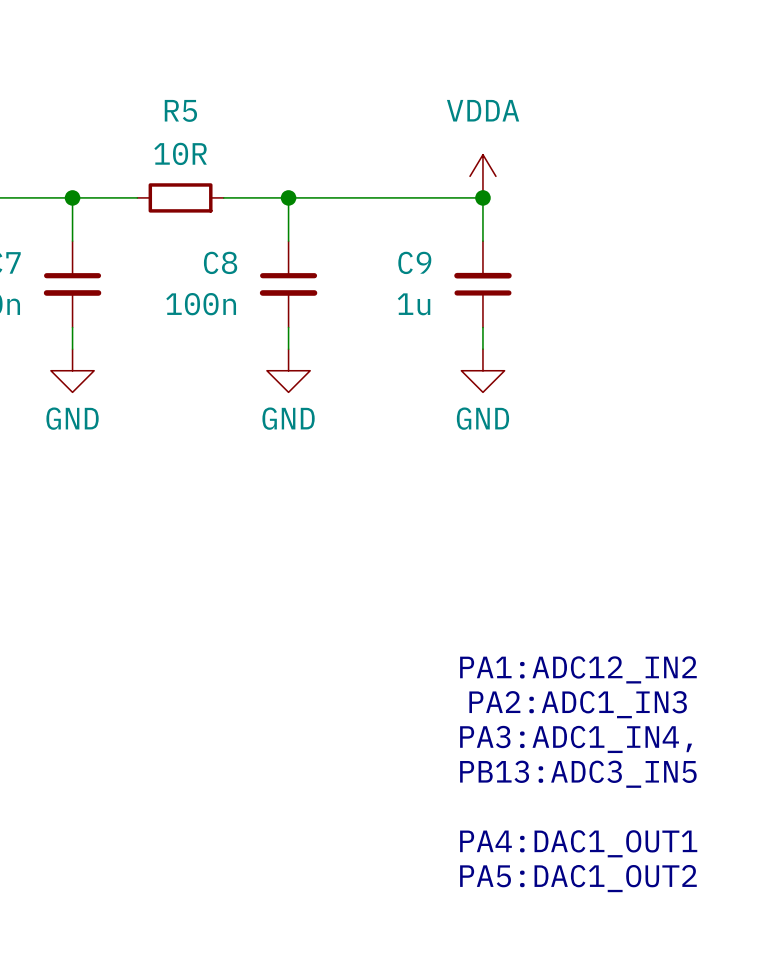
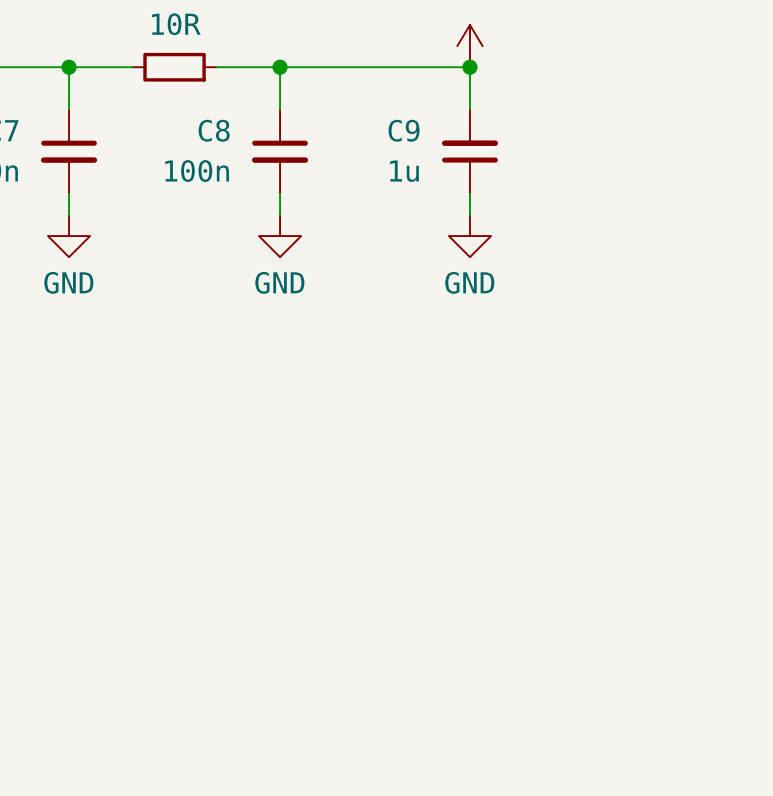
text: PA1:ADC12_IN2 (578, 669) -> none
text: PA2:ADC1_IN3 (578, 704) -> none
text: PA3:ADC1_IN4, (576, 739) -> none
text: PB13:ADC3_IN5 (578, 774) -> none
text: PA4:DAC1_OUT1 (578, 843) -> none
text: PA5:DAC1_OUT2 (578, 878) -> none

